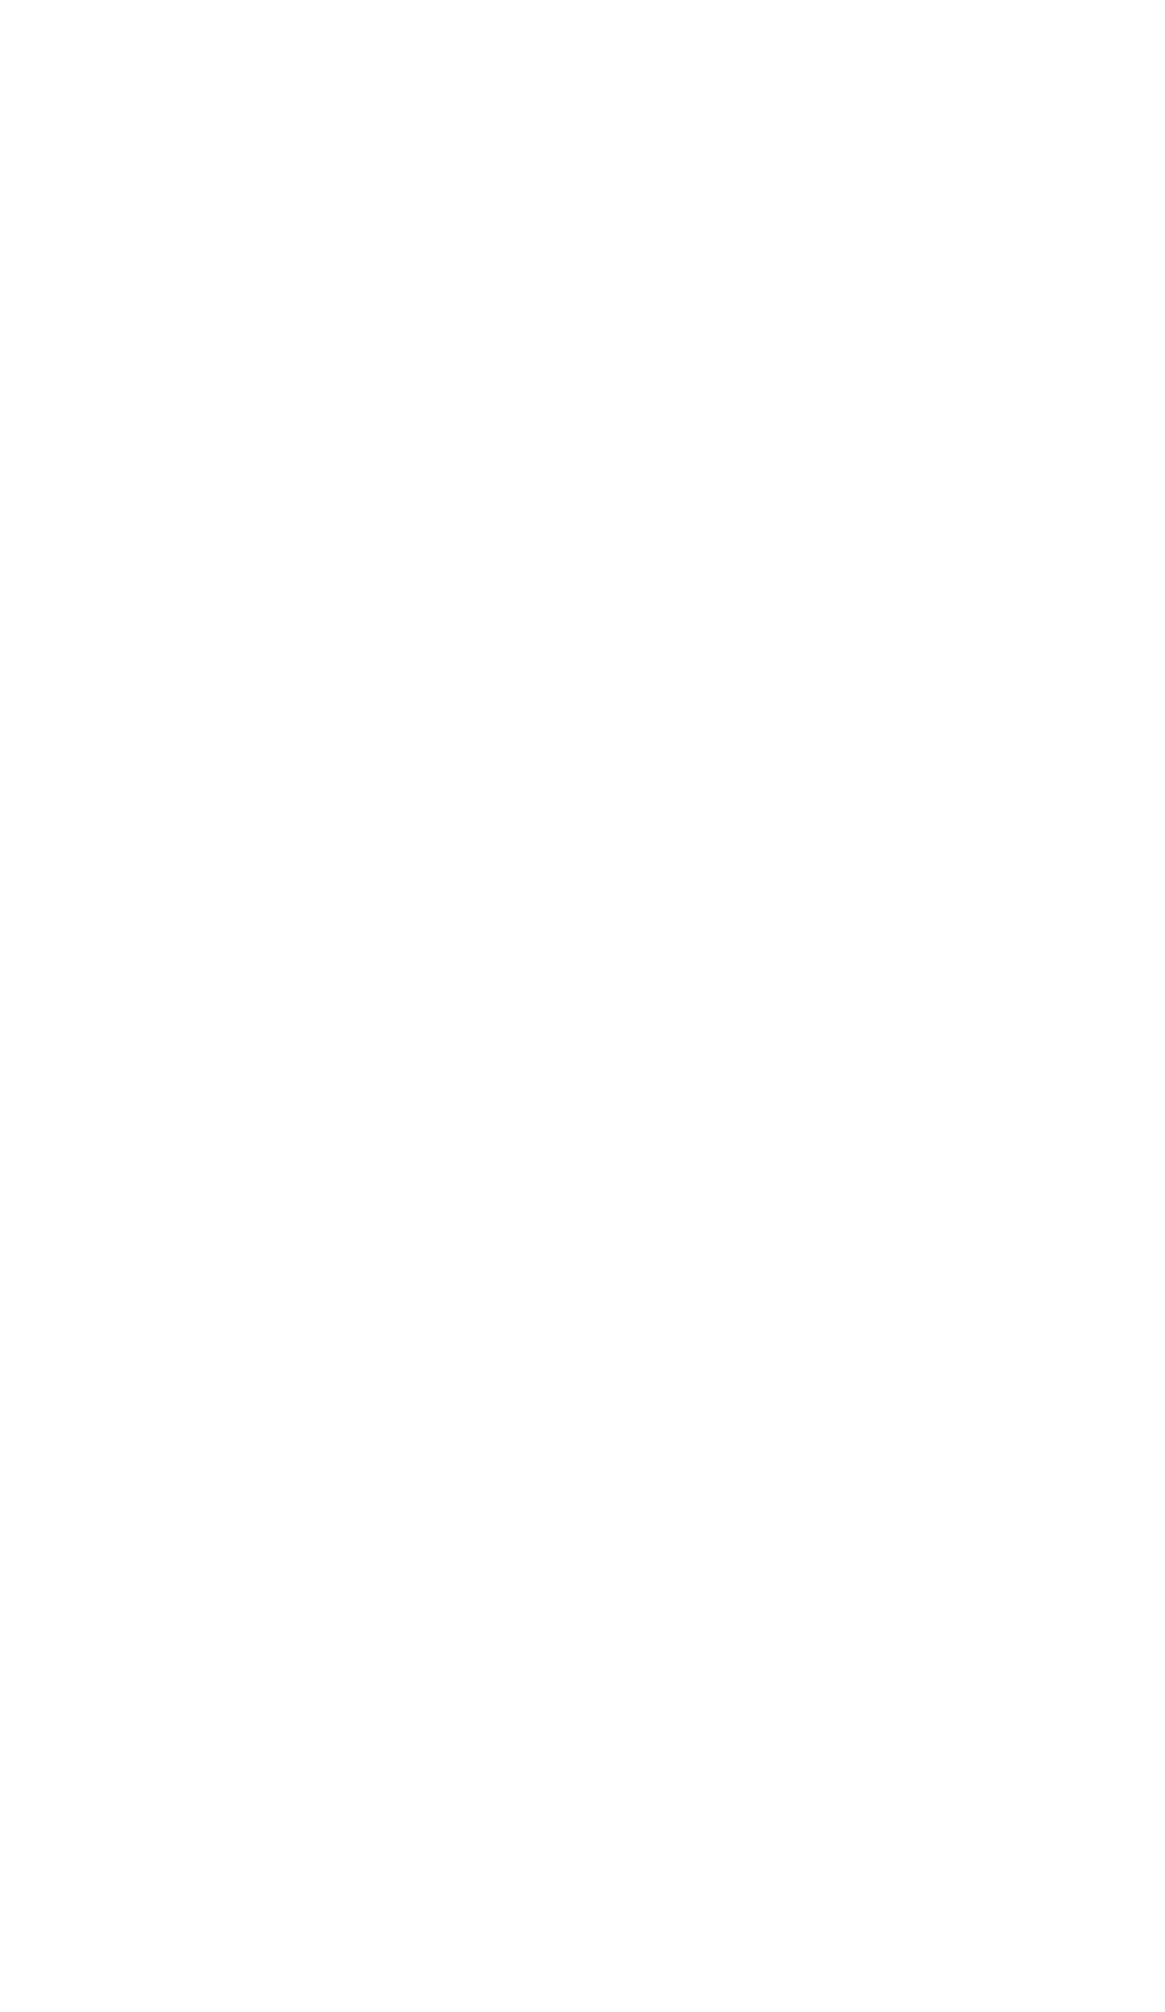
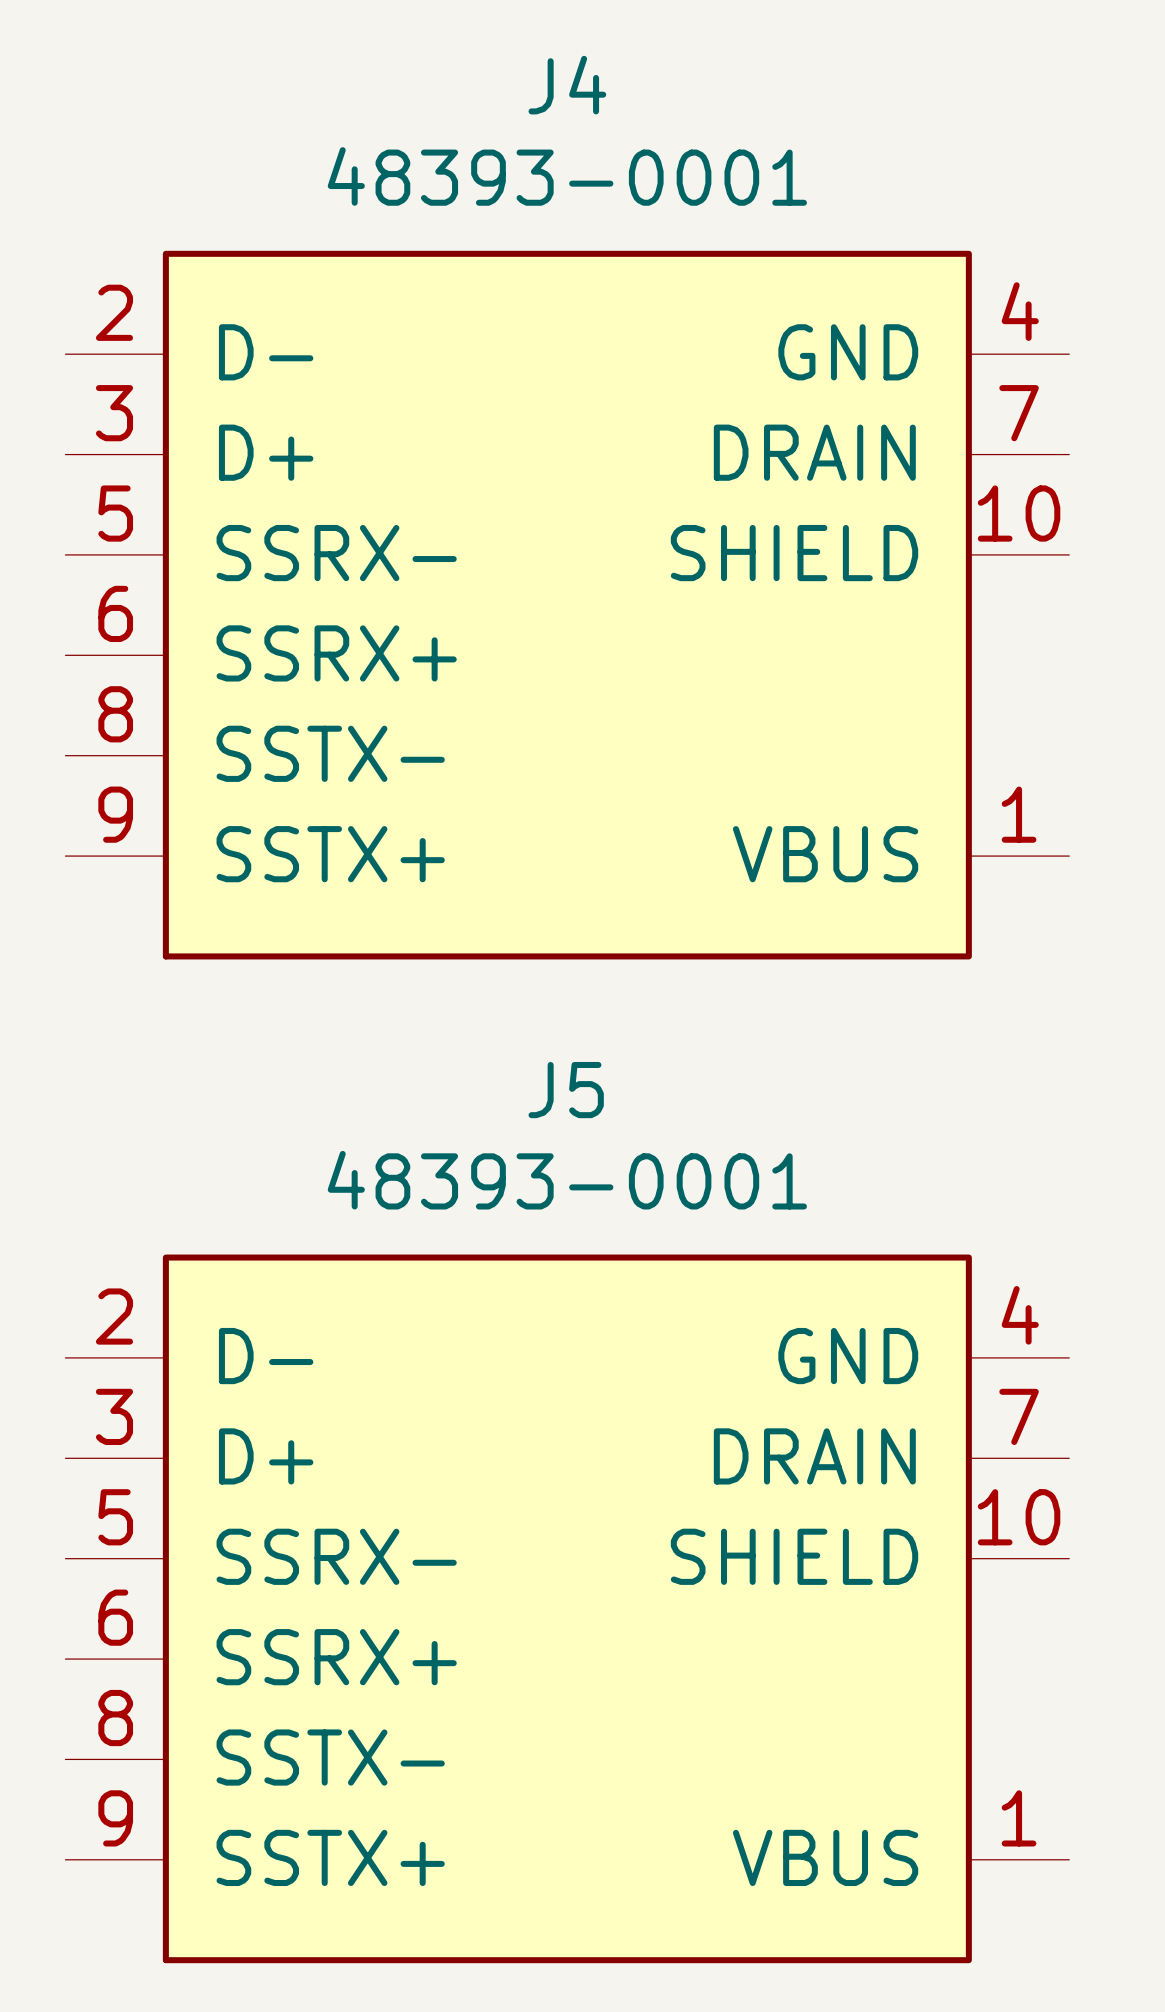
J4: none -> 48393-0001 (567, 605)
J5: none -> 48393-0001 (567, 1608)

